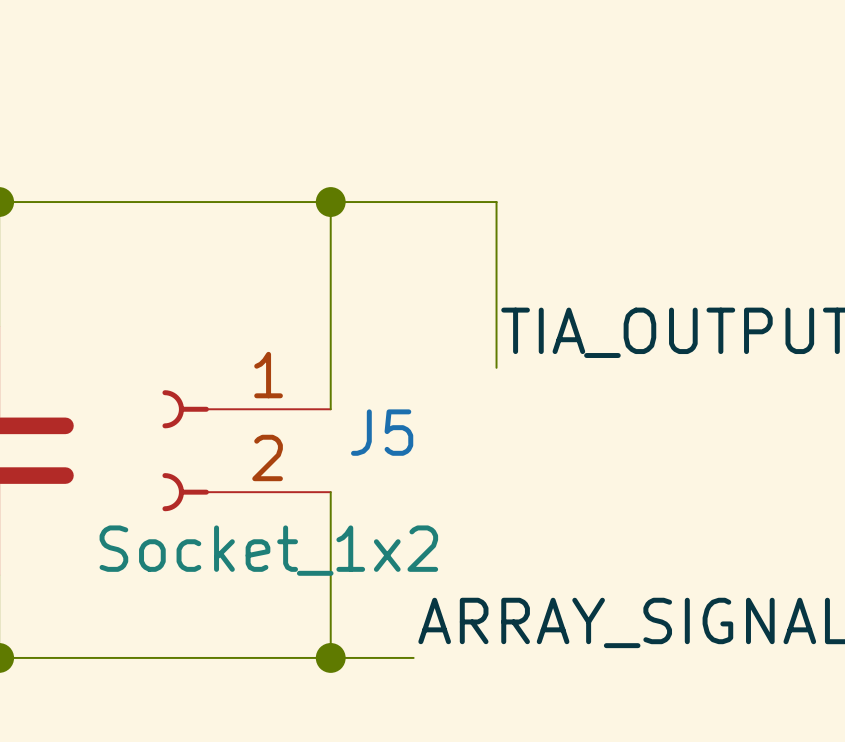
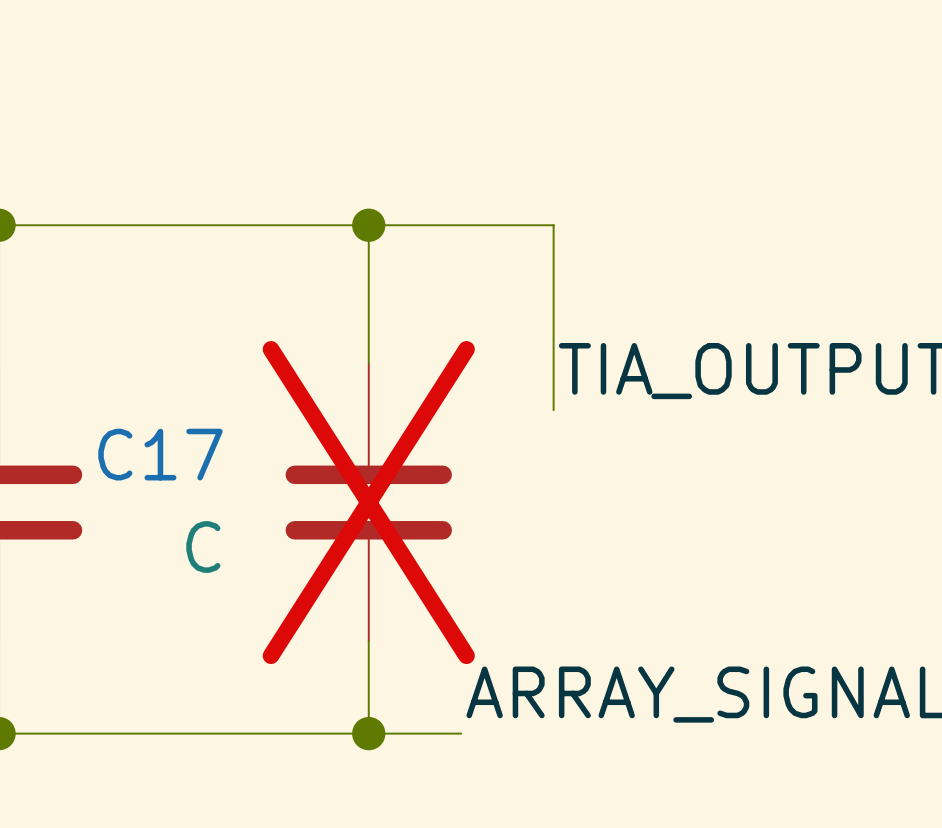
J5: Socket_1x2 (246, 450) -> none
C17: none -> C (368, 502)

